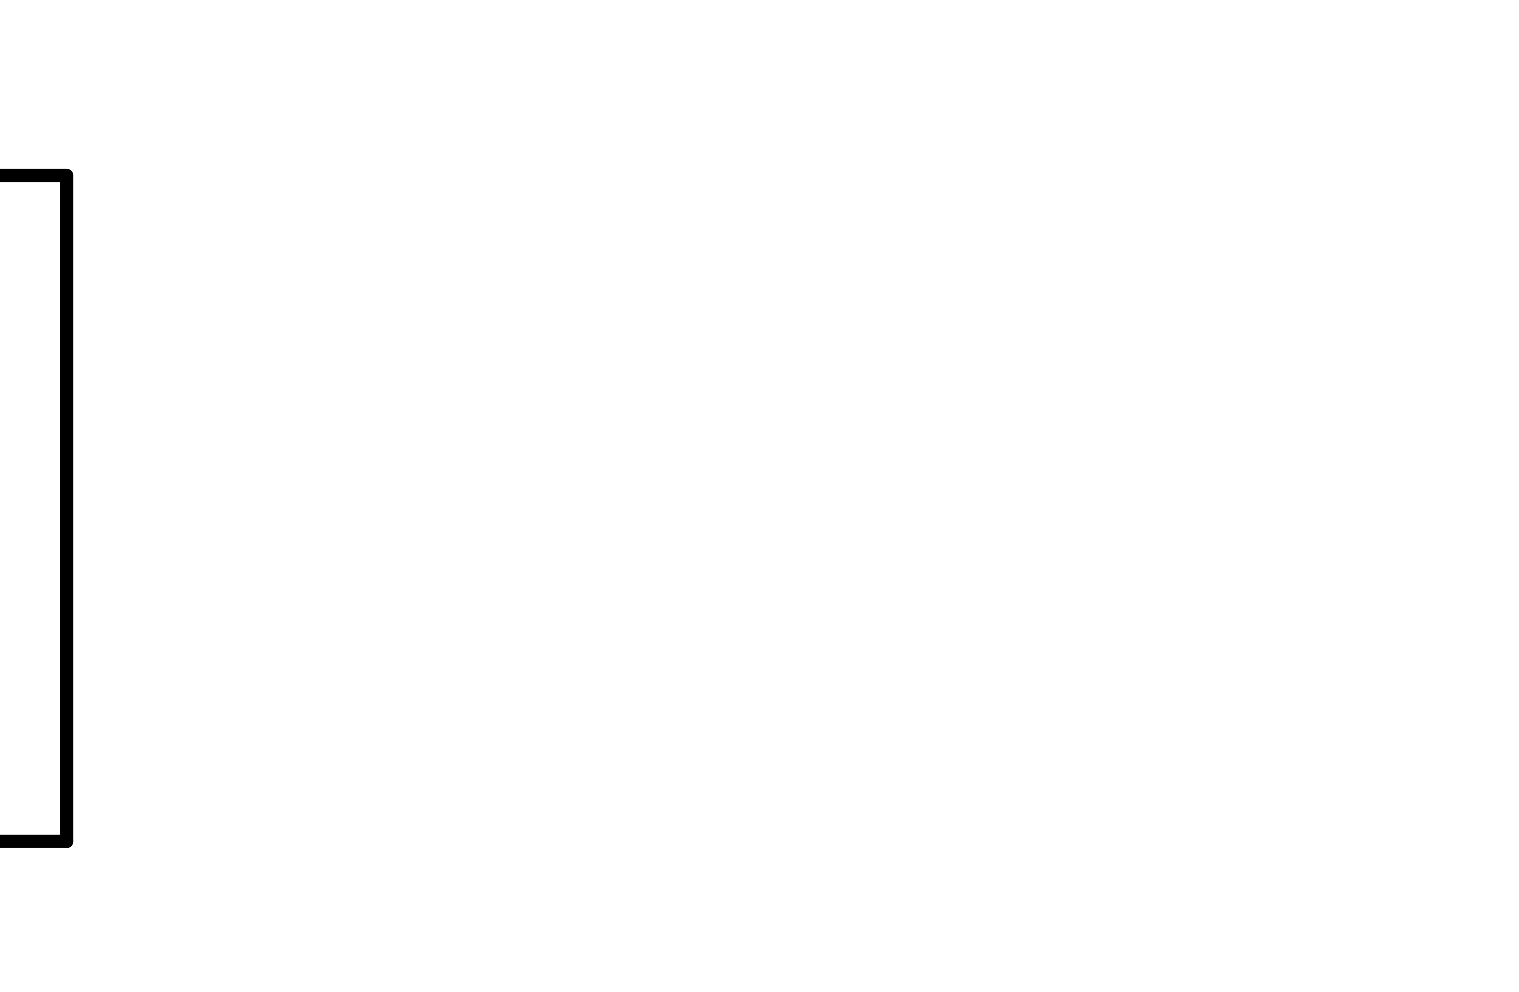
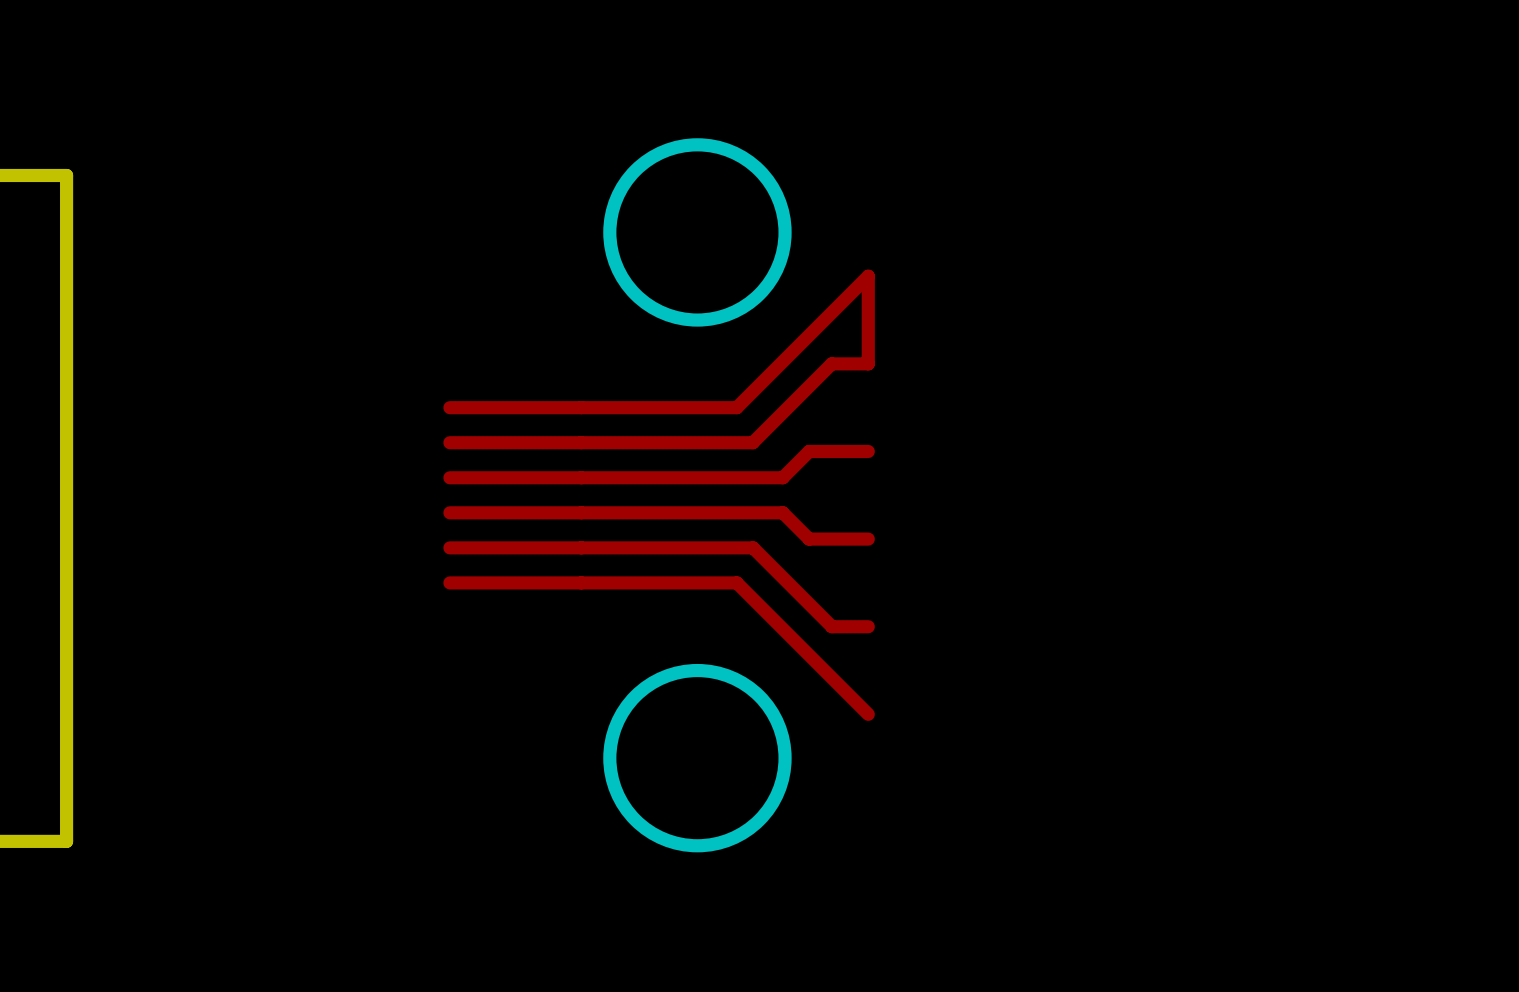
drawing: none -> [603, 138, 792, 327]
track: none -> (449, 407) (736, 407) (868, 276) (868, 363) (831, 363) (752, 442) (449, 442)
track: none -> (868, 451) (809, 451) (782, 477) (449, 477)
track: none -> (449, 512) (782, 512) (809, 539) (868, 539)
track: none -> (449, 547) (753, 547) (831, 626) (868, 626)
track: none -> (449, 582) (736, 582) (868, 714)
drawing: none -> [603, 663, 792, 853]

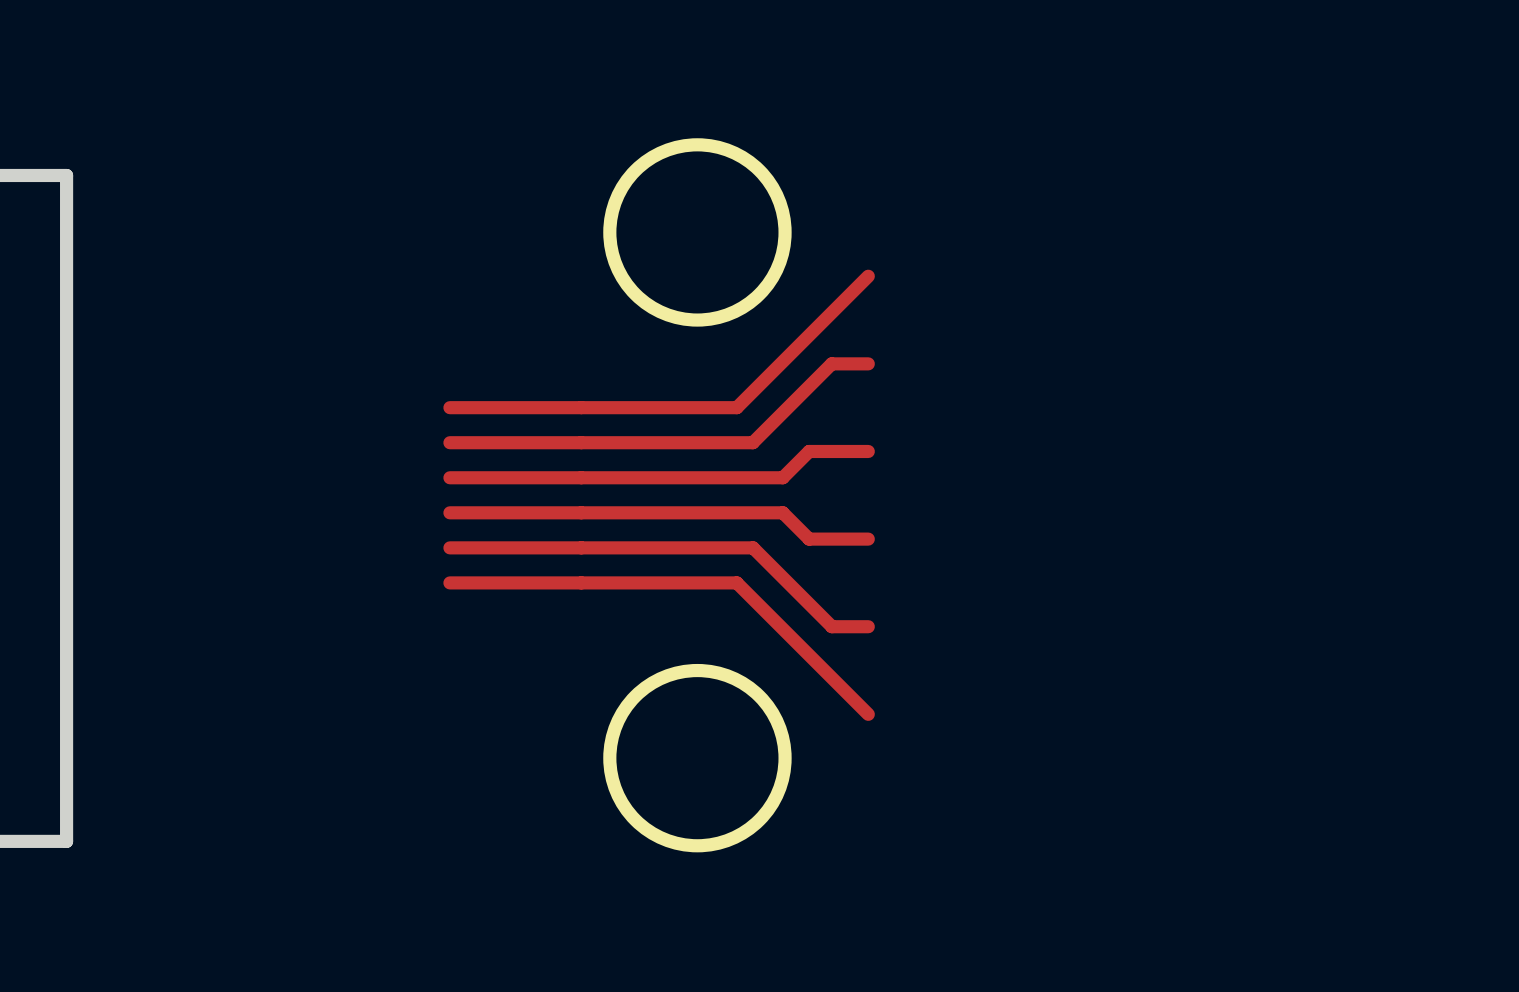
track: (868, 276) (868, 363) -> none

